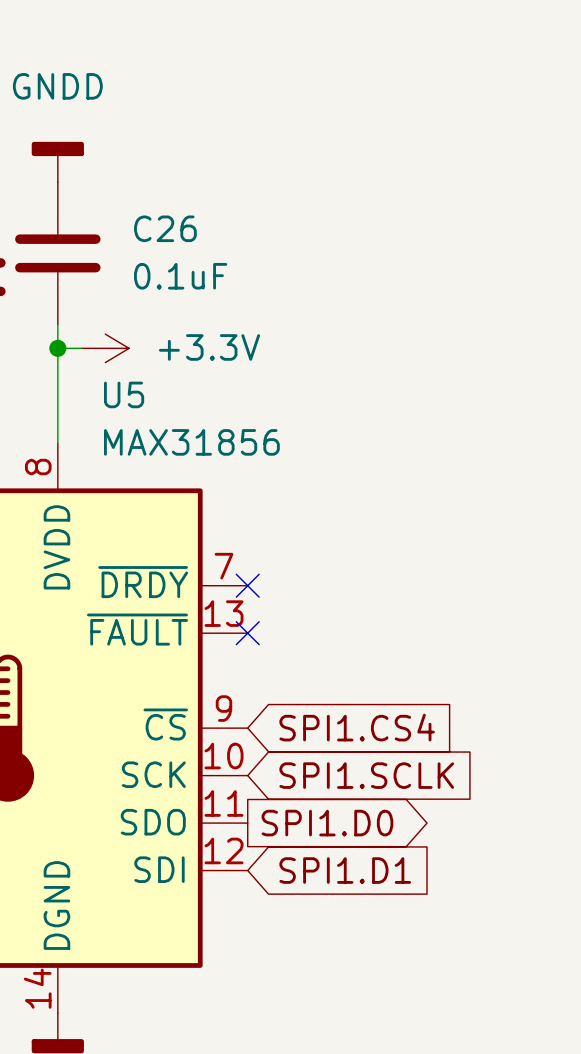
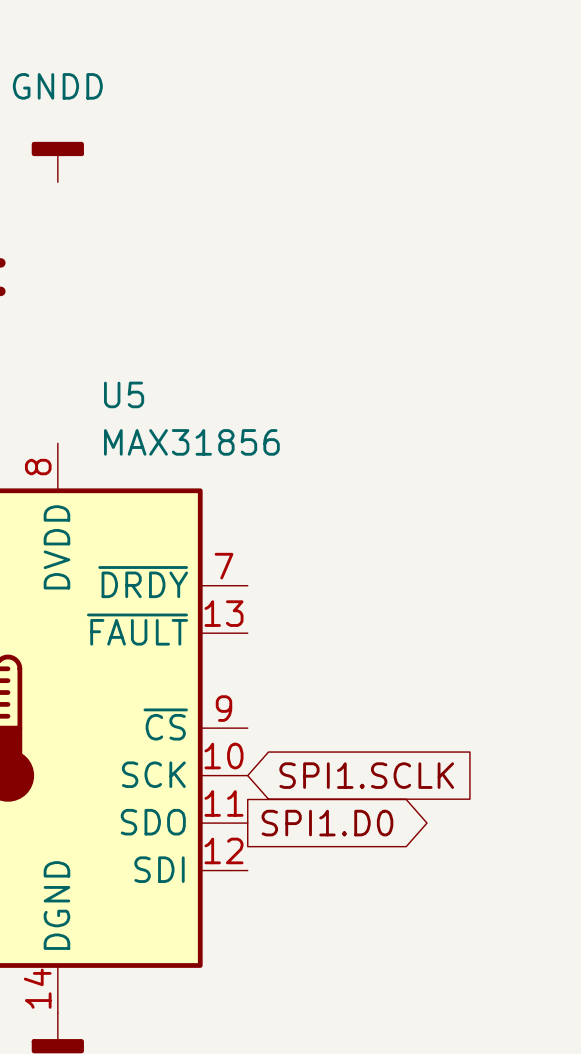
C26: 0.1uF (57, 253) -> none
wire: (57, 324) (57, 443) -> none
wire: (57, 348) (81, 348) -> none
junction: (57, 348) -> none
power symbol: +3.3V (105, 348) -> none
no-connect mark: (247, 585) -> none
no-connect mark: (247, 633) -> none
global label: SPI1.CS4 (357, 727) -> none
global label: SPI1.D1 (345, 870) -> none

